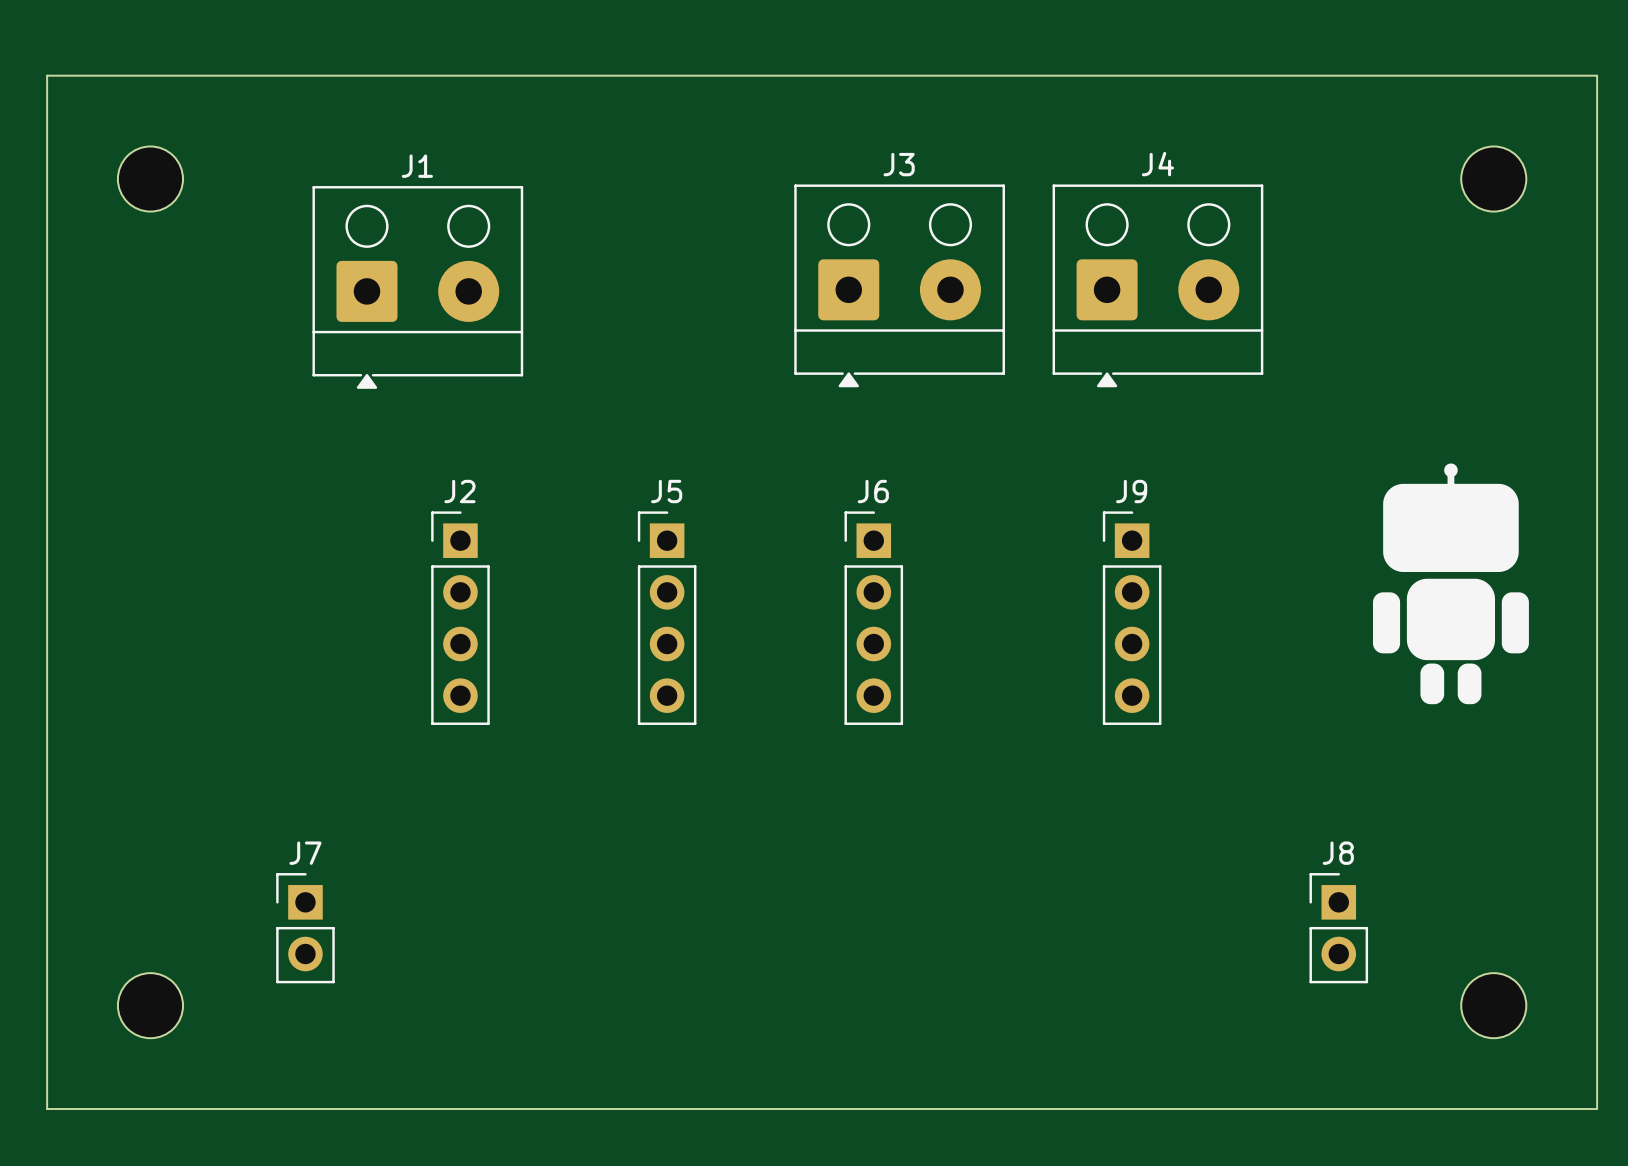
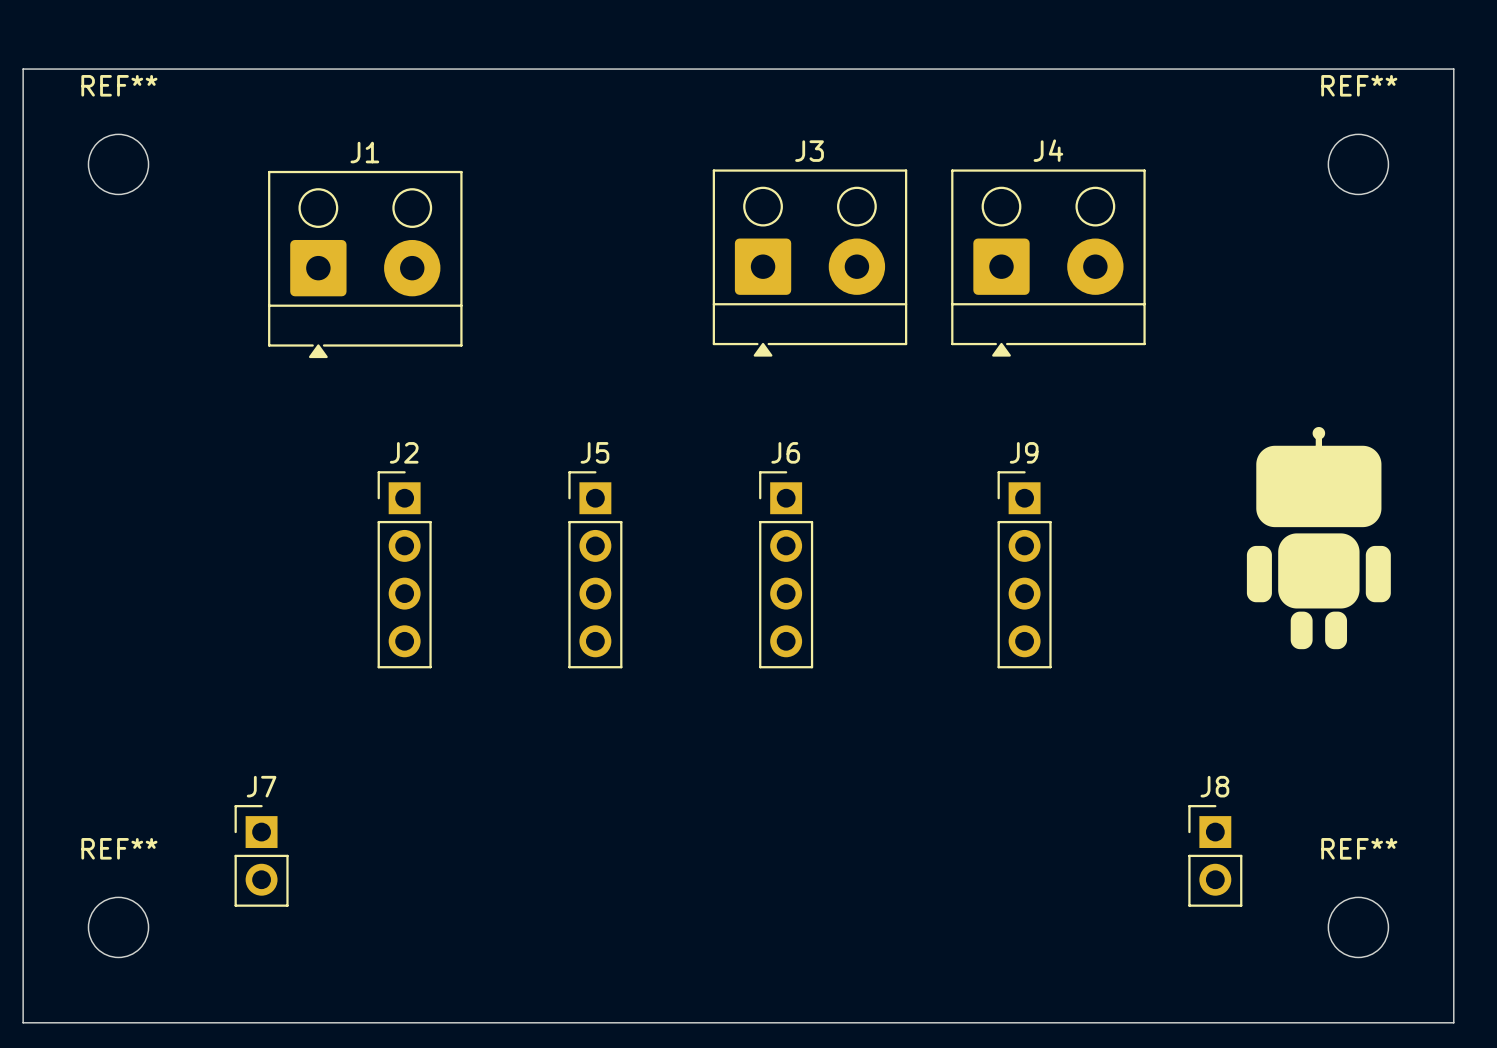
REF** name: none -> REF** (119, 85)
REF** name: none -> REF** (1359, 85)
REF** name: none -> REF** (119, 848)
REF** name: none -> REF** (1359, 848)

